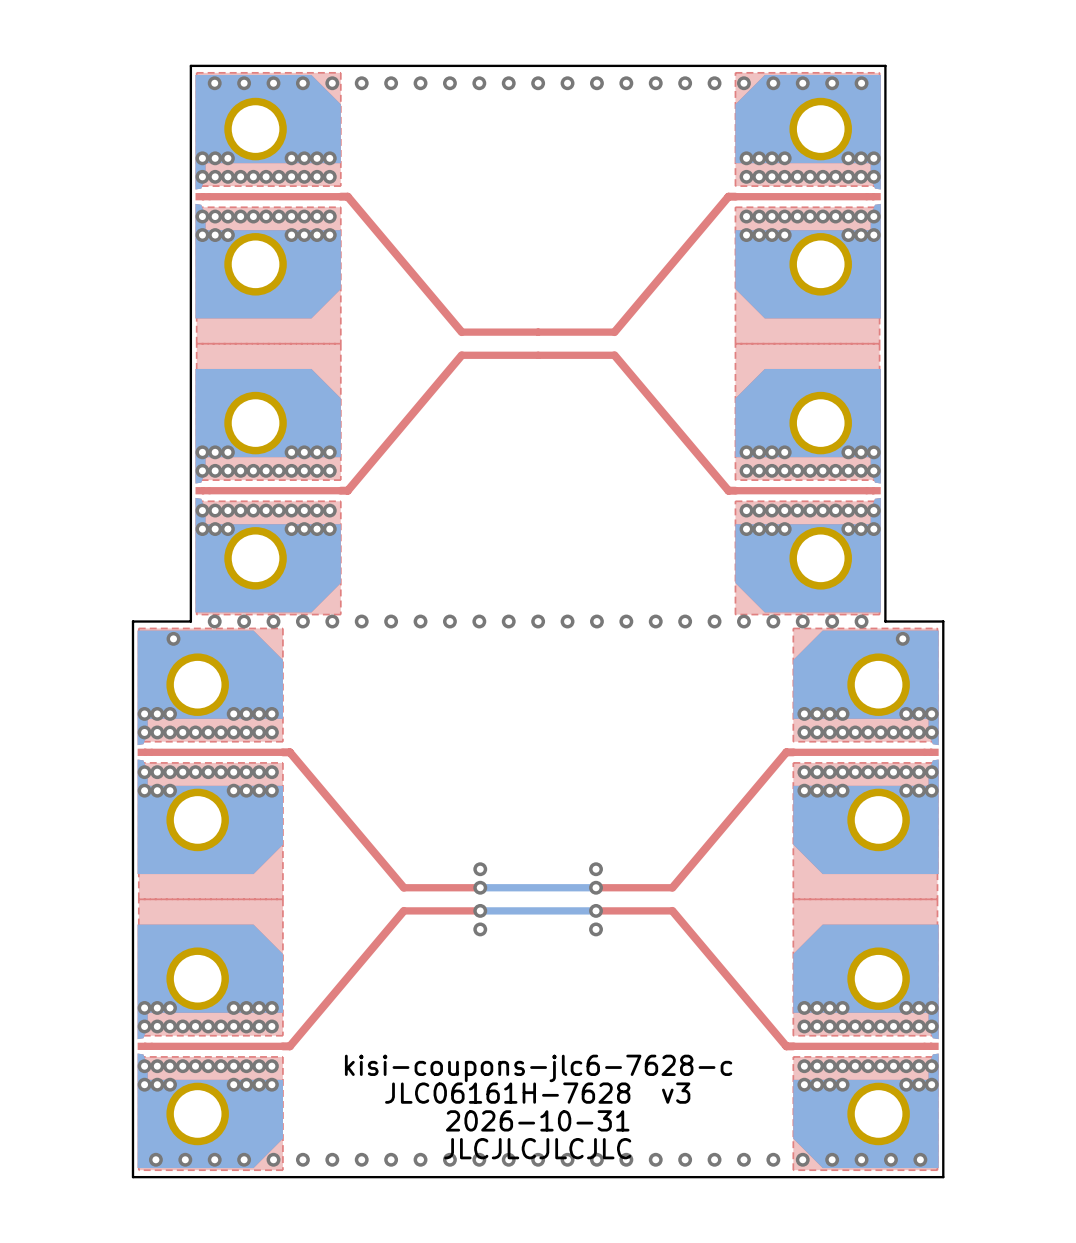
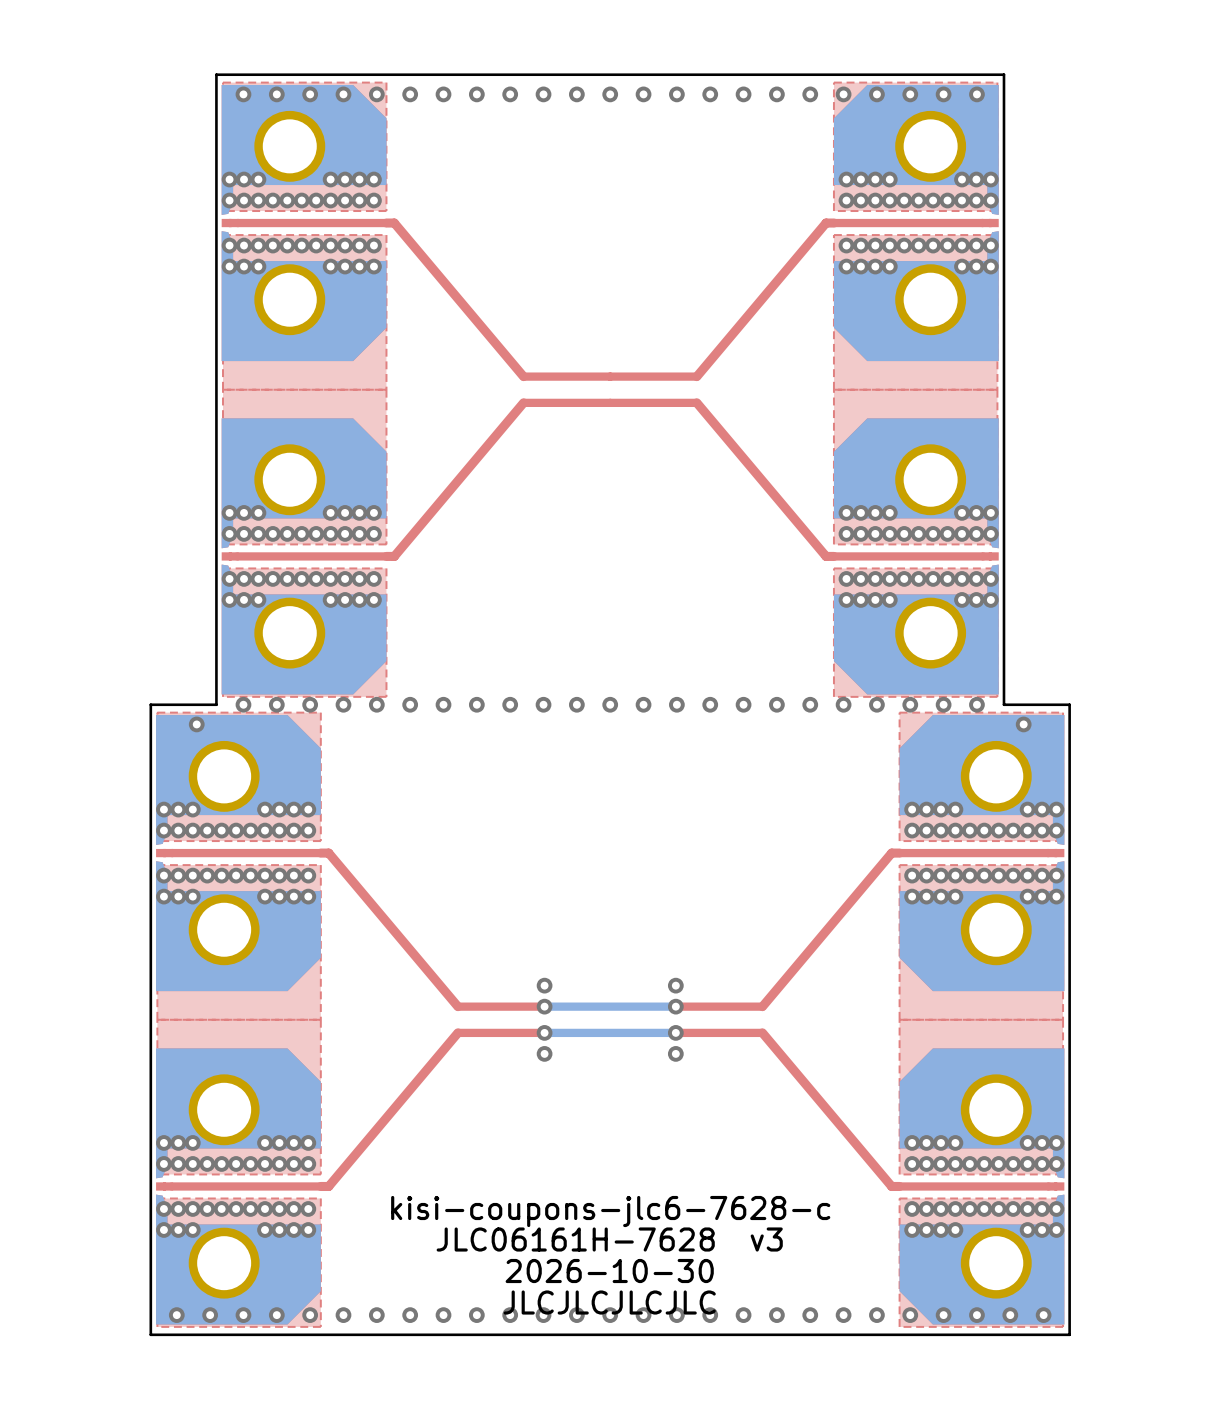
text: 2026-10-31 (537, 1120) -> 2026-10-30 (609, 1271)

